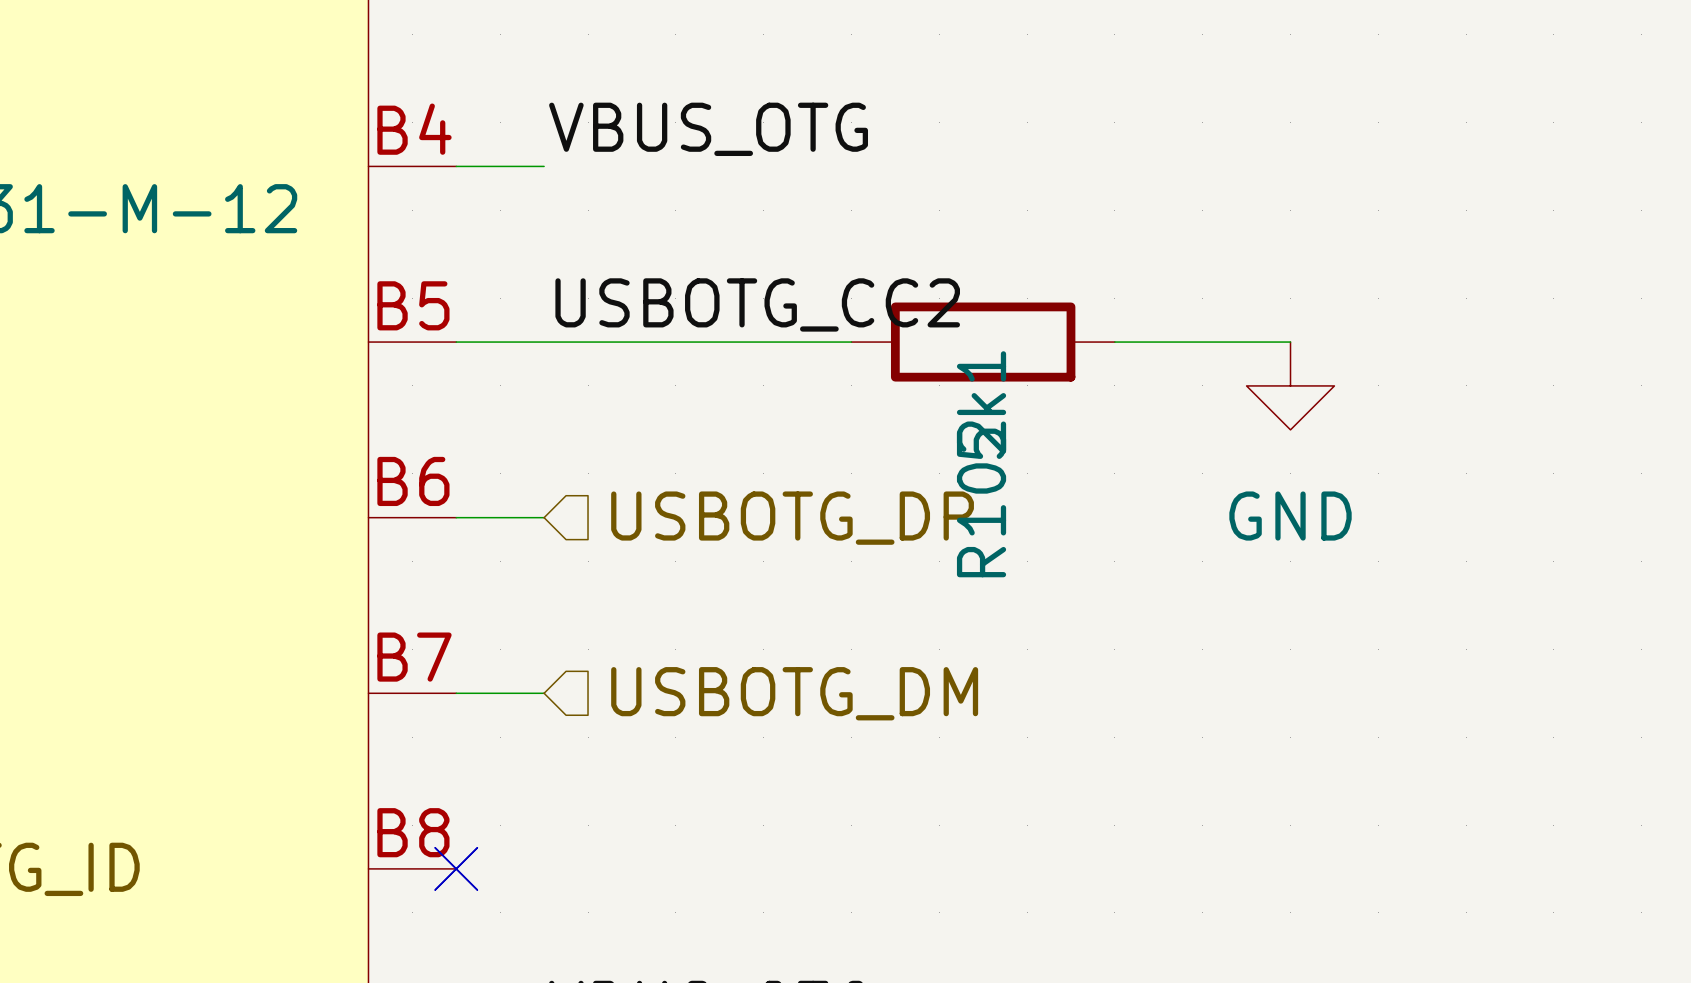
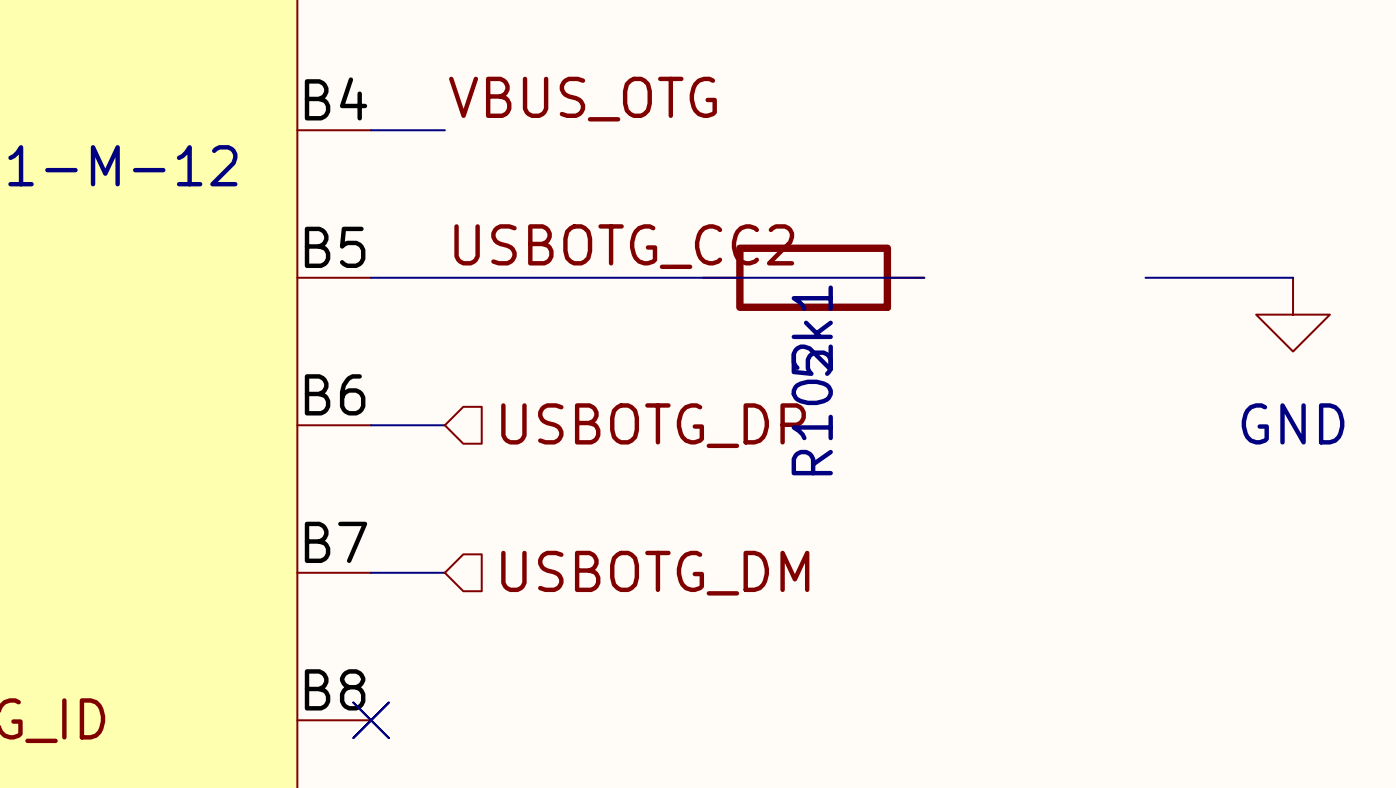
wire: (1114, 342) (1290, 342) -> (924, 277) (703, 277)
wire: none -> (1145, 277) (1293, 277)
power symbol position: GND (1290, 385) -> GND (1293, 314)

